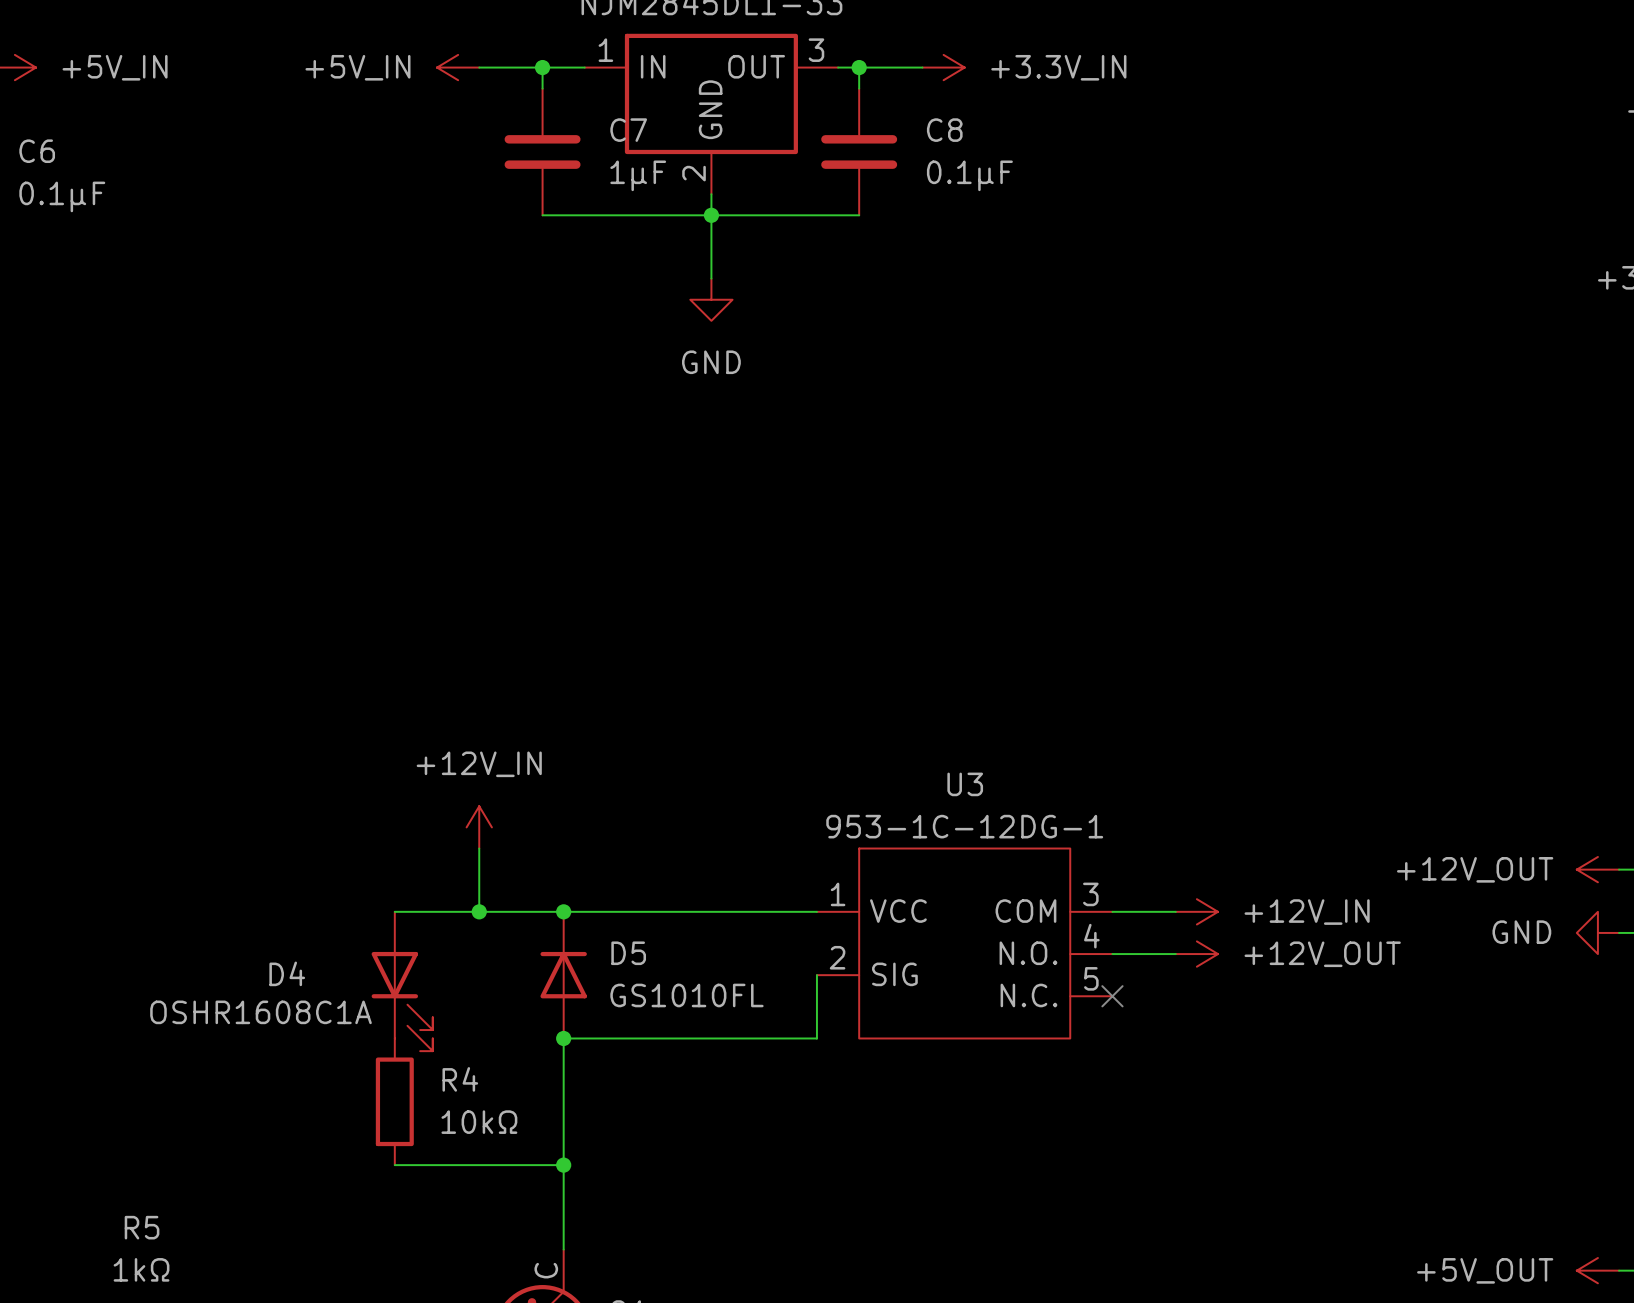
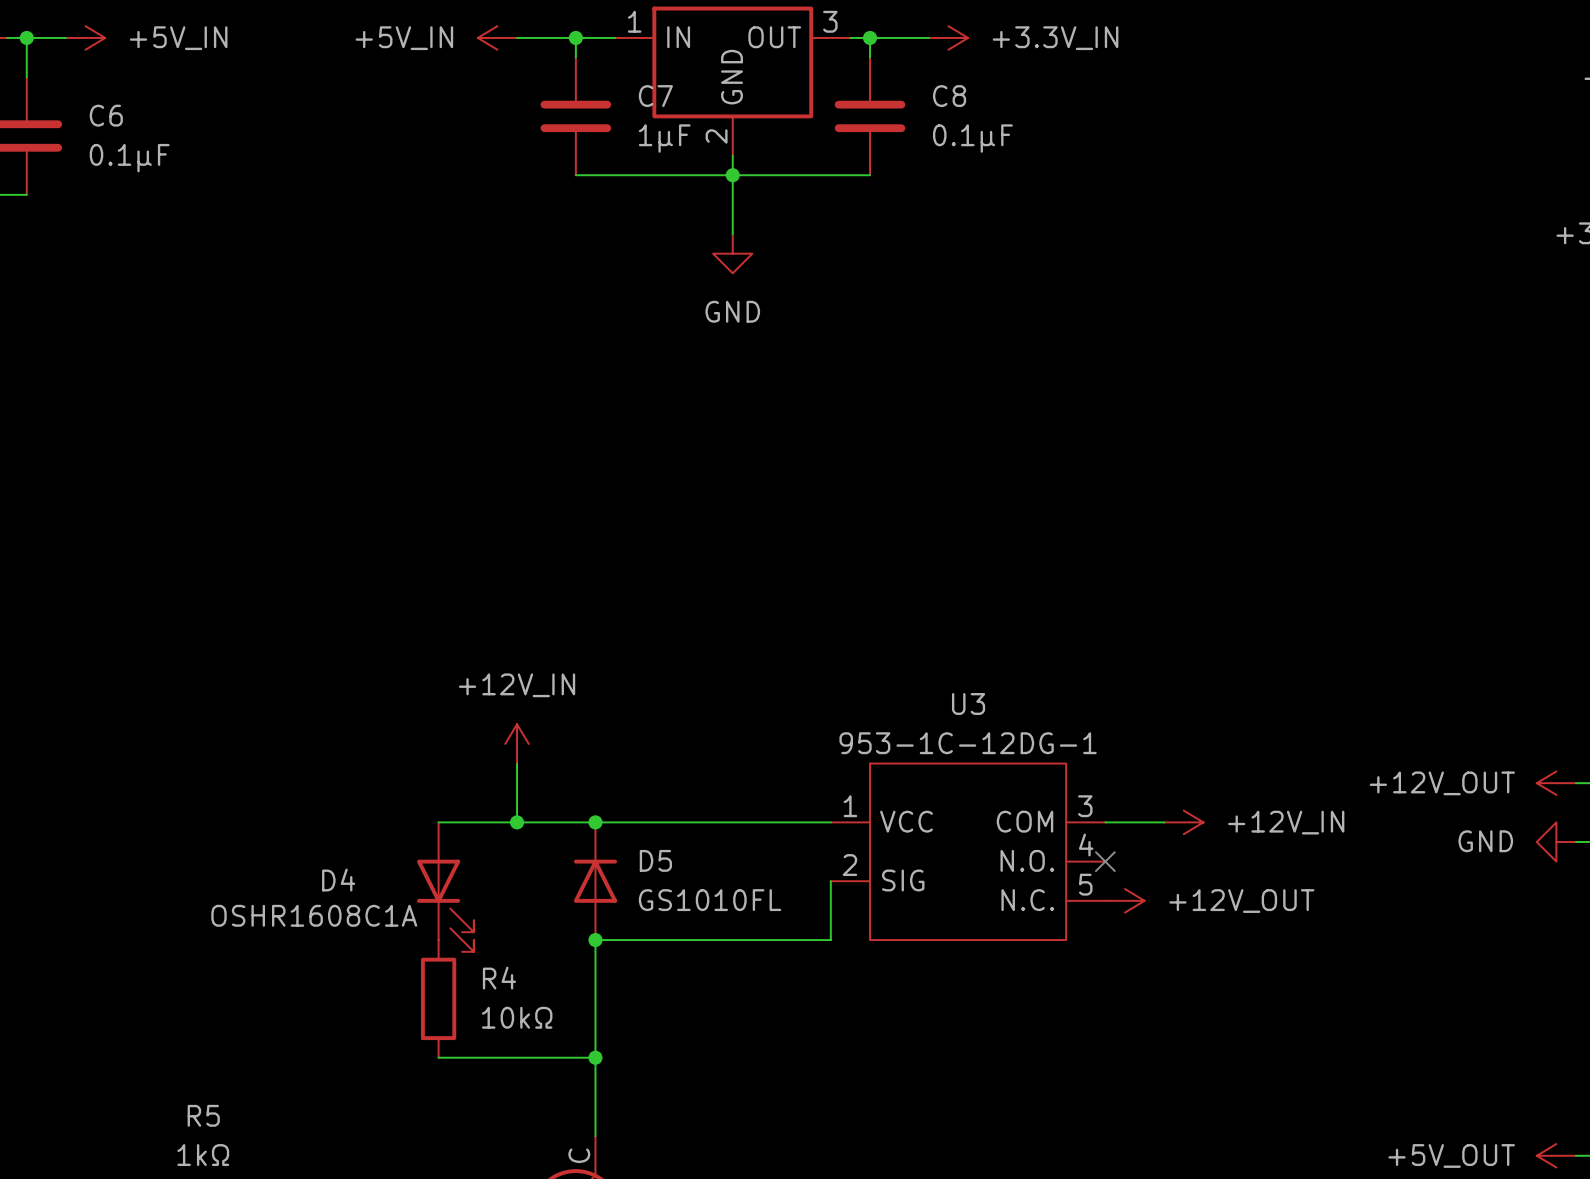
wire: (1112, 954) (1175, 954) -> none
power symbol position: +12V_OUT (1196, 954) -> +12V_OUT (1124, 900)
no-connect mark position: (1112, 996) -> (1105, 861)

